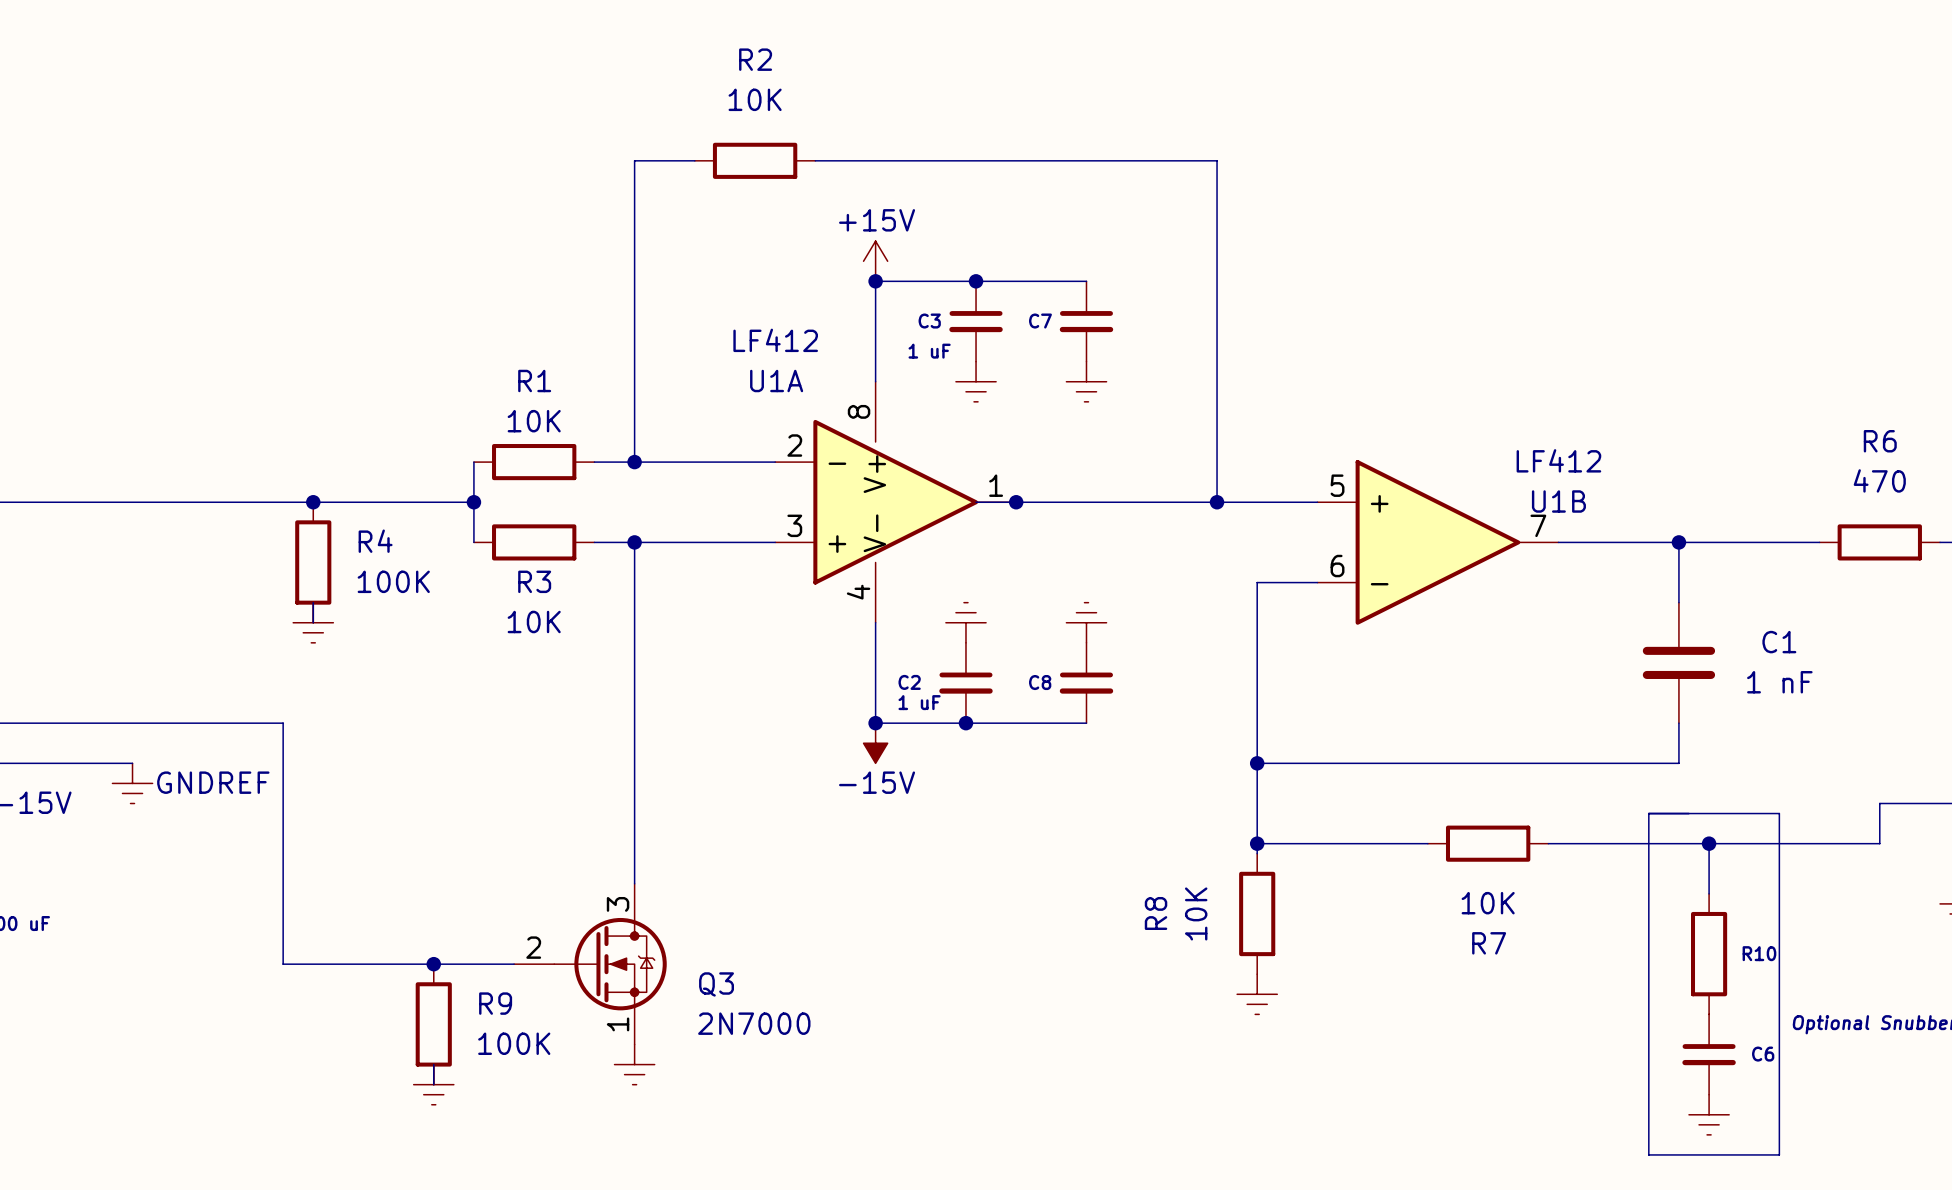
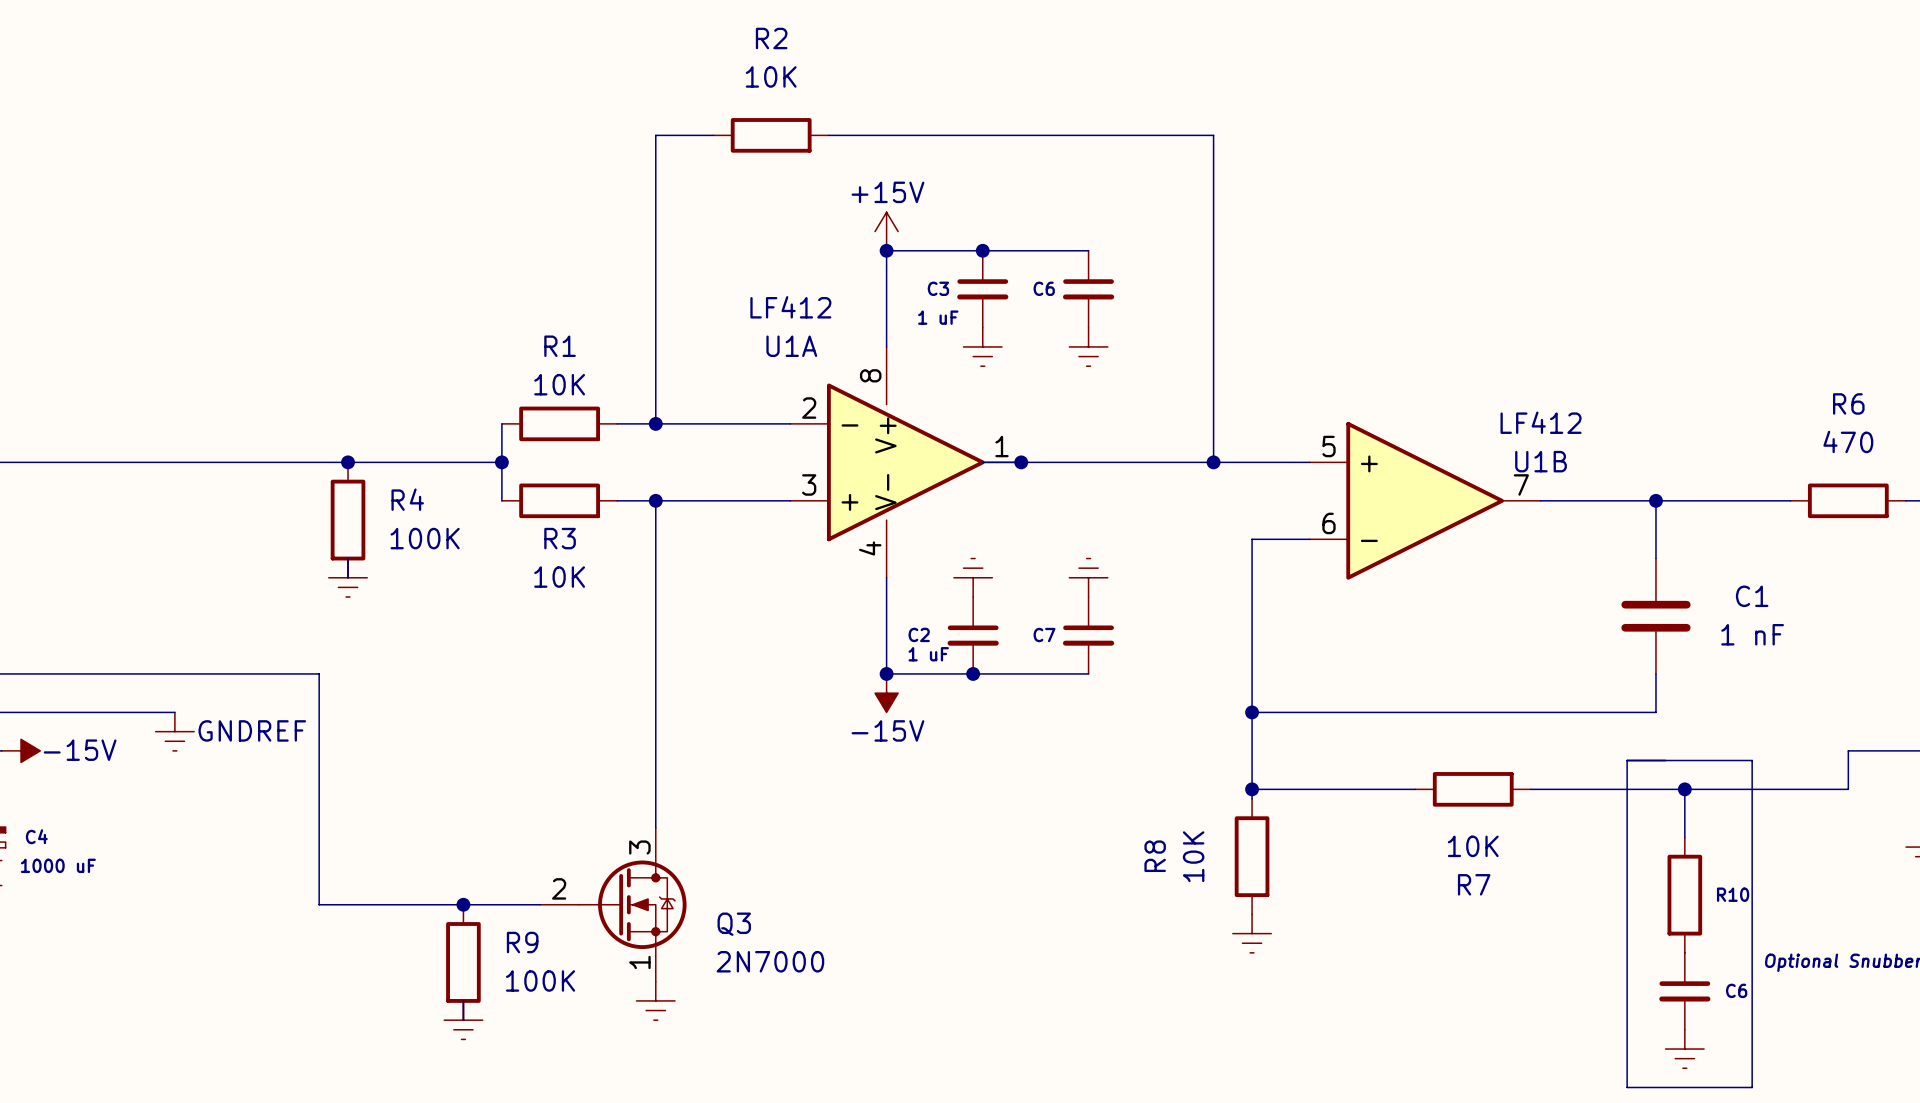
C7 name: C7 (1040, 321) -> C6 (1044, 288)
C8 name: C8 (1040, 682) -> C7 (1044, 635)

